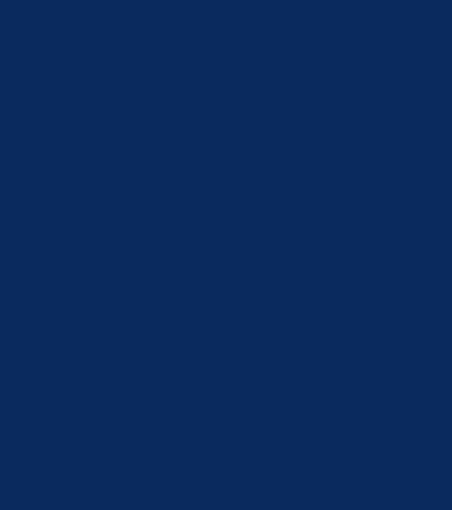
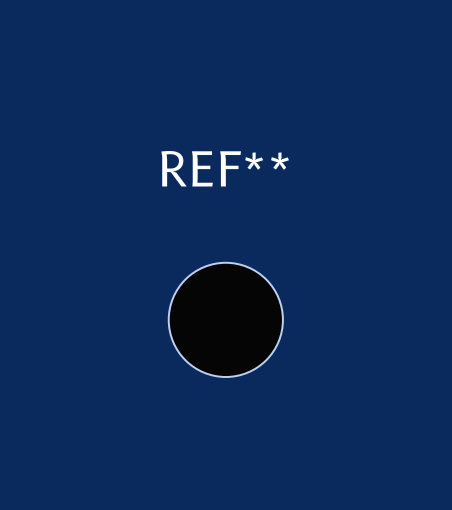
REF**: none -> (225, 319)

